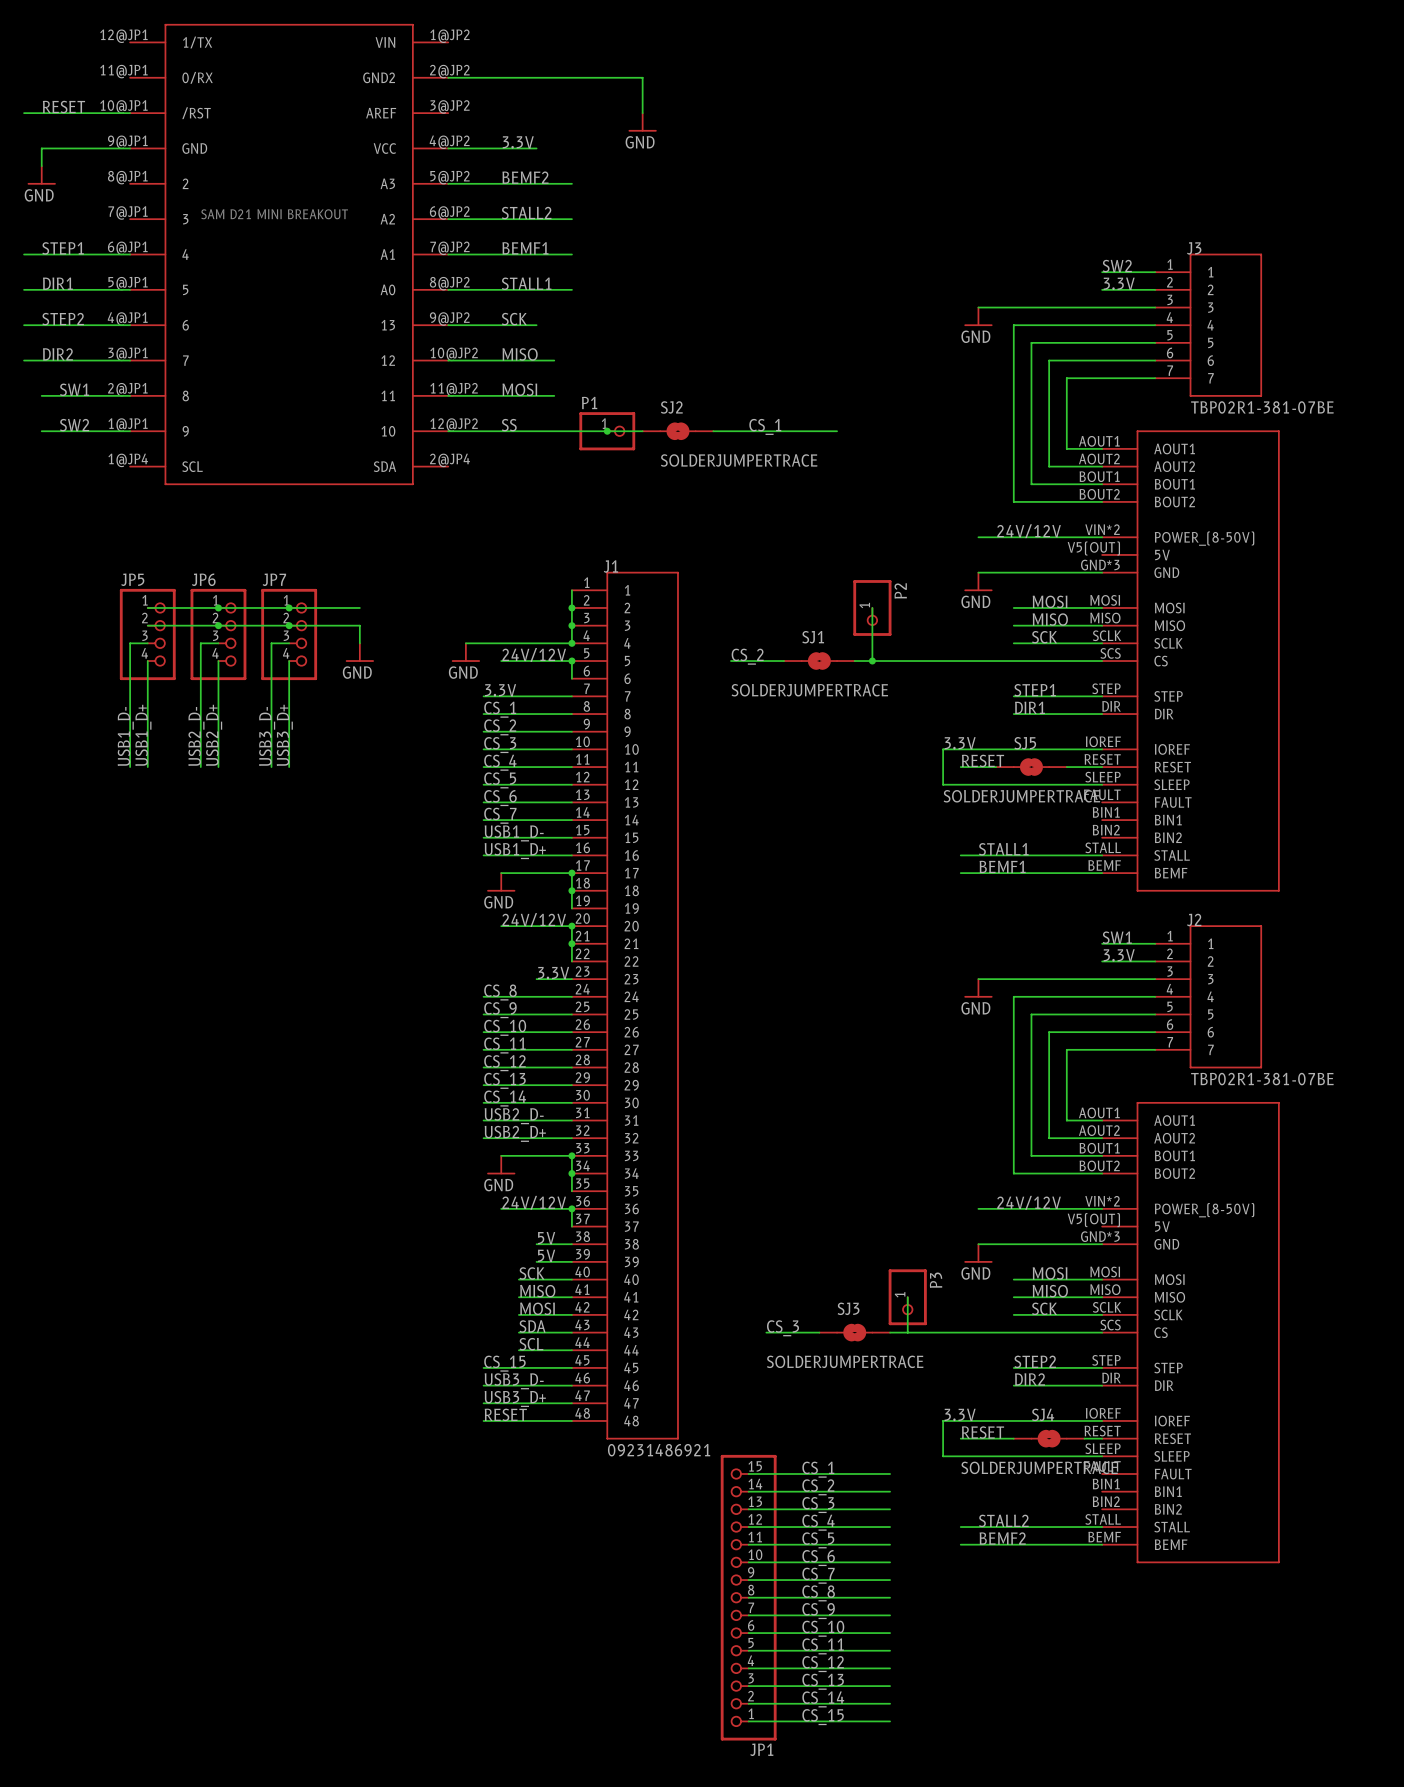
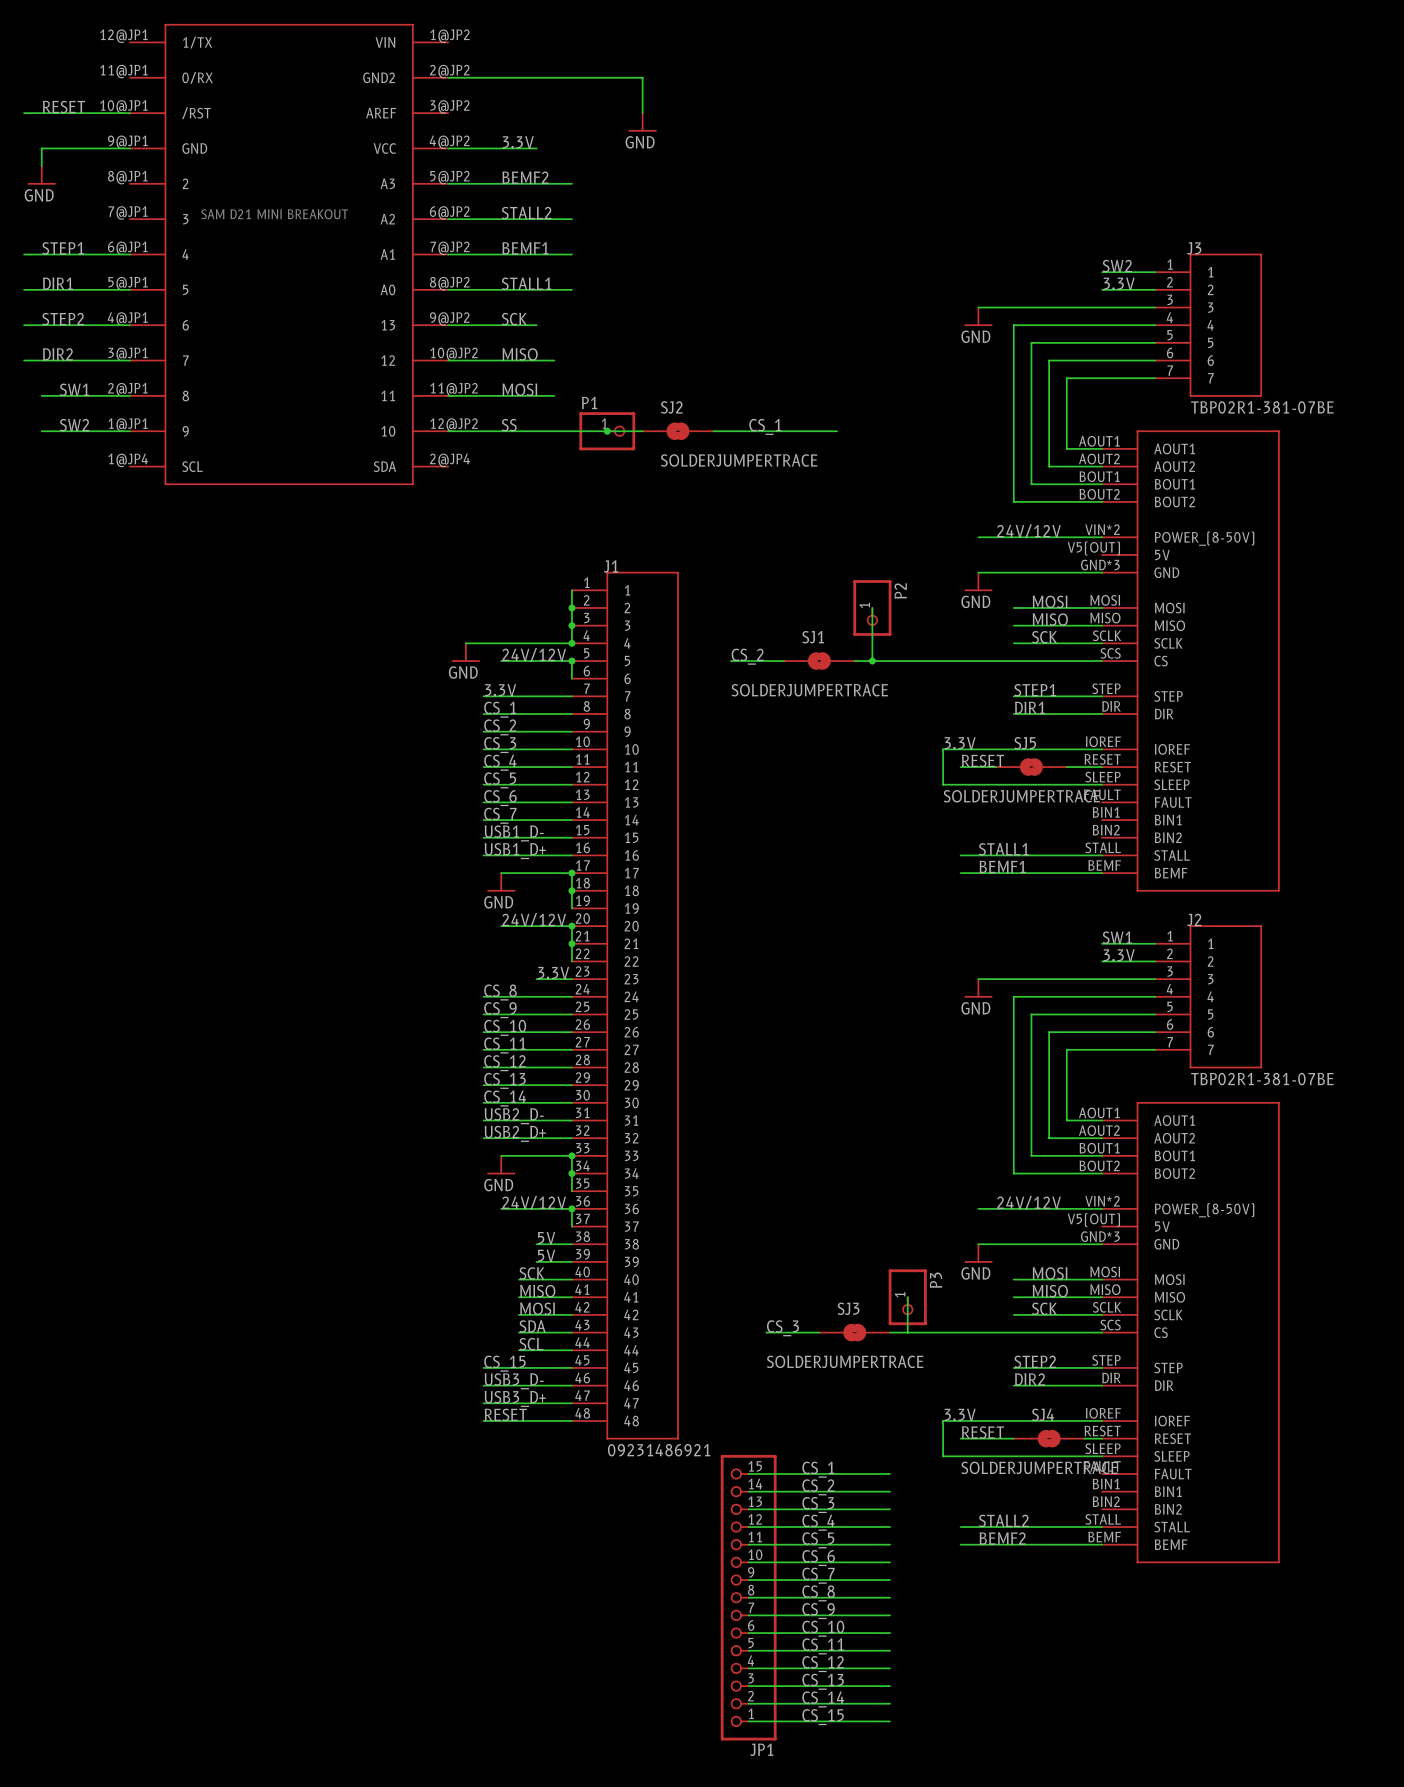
wire: (147, 607) (359, 607) -> none
junction: (218, 607) -> none
junction: (289, 607) -> none
wire: (147, 625) (359, 625) (359, 643) -> none
junction: (218, 625) -> none
junction: (289, 625) -> none
JP5: (147, 634) -> none
JP6: (218, 634) -> none
JP7: (289, 634) -> none
wire: (147, 643) (130, 643) (130, 767) -> none
wire: (218, 643) (200, 643) (200, 767) -> none
wire: (289, 643) (271, 643) (271, 767) -> none
power symbol: GND (359, 652) -> none
wire: (147, 661) (147, 767) -> none
wire: (218, 661) (218, 767) -> none
wire: (289, 661) (289, 767) -> none
label: USB1_D+ (143, 735) -> none
label: USB2_D+ (214, 735) -> none
label: USB3_D+ (284, 735) -> none
label: USB1_D- (125, 736) -> none
label: USB2_D- (196, 736) -> none
label: USB3_D- (267, 736) -> none

